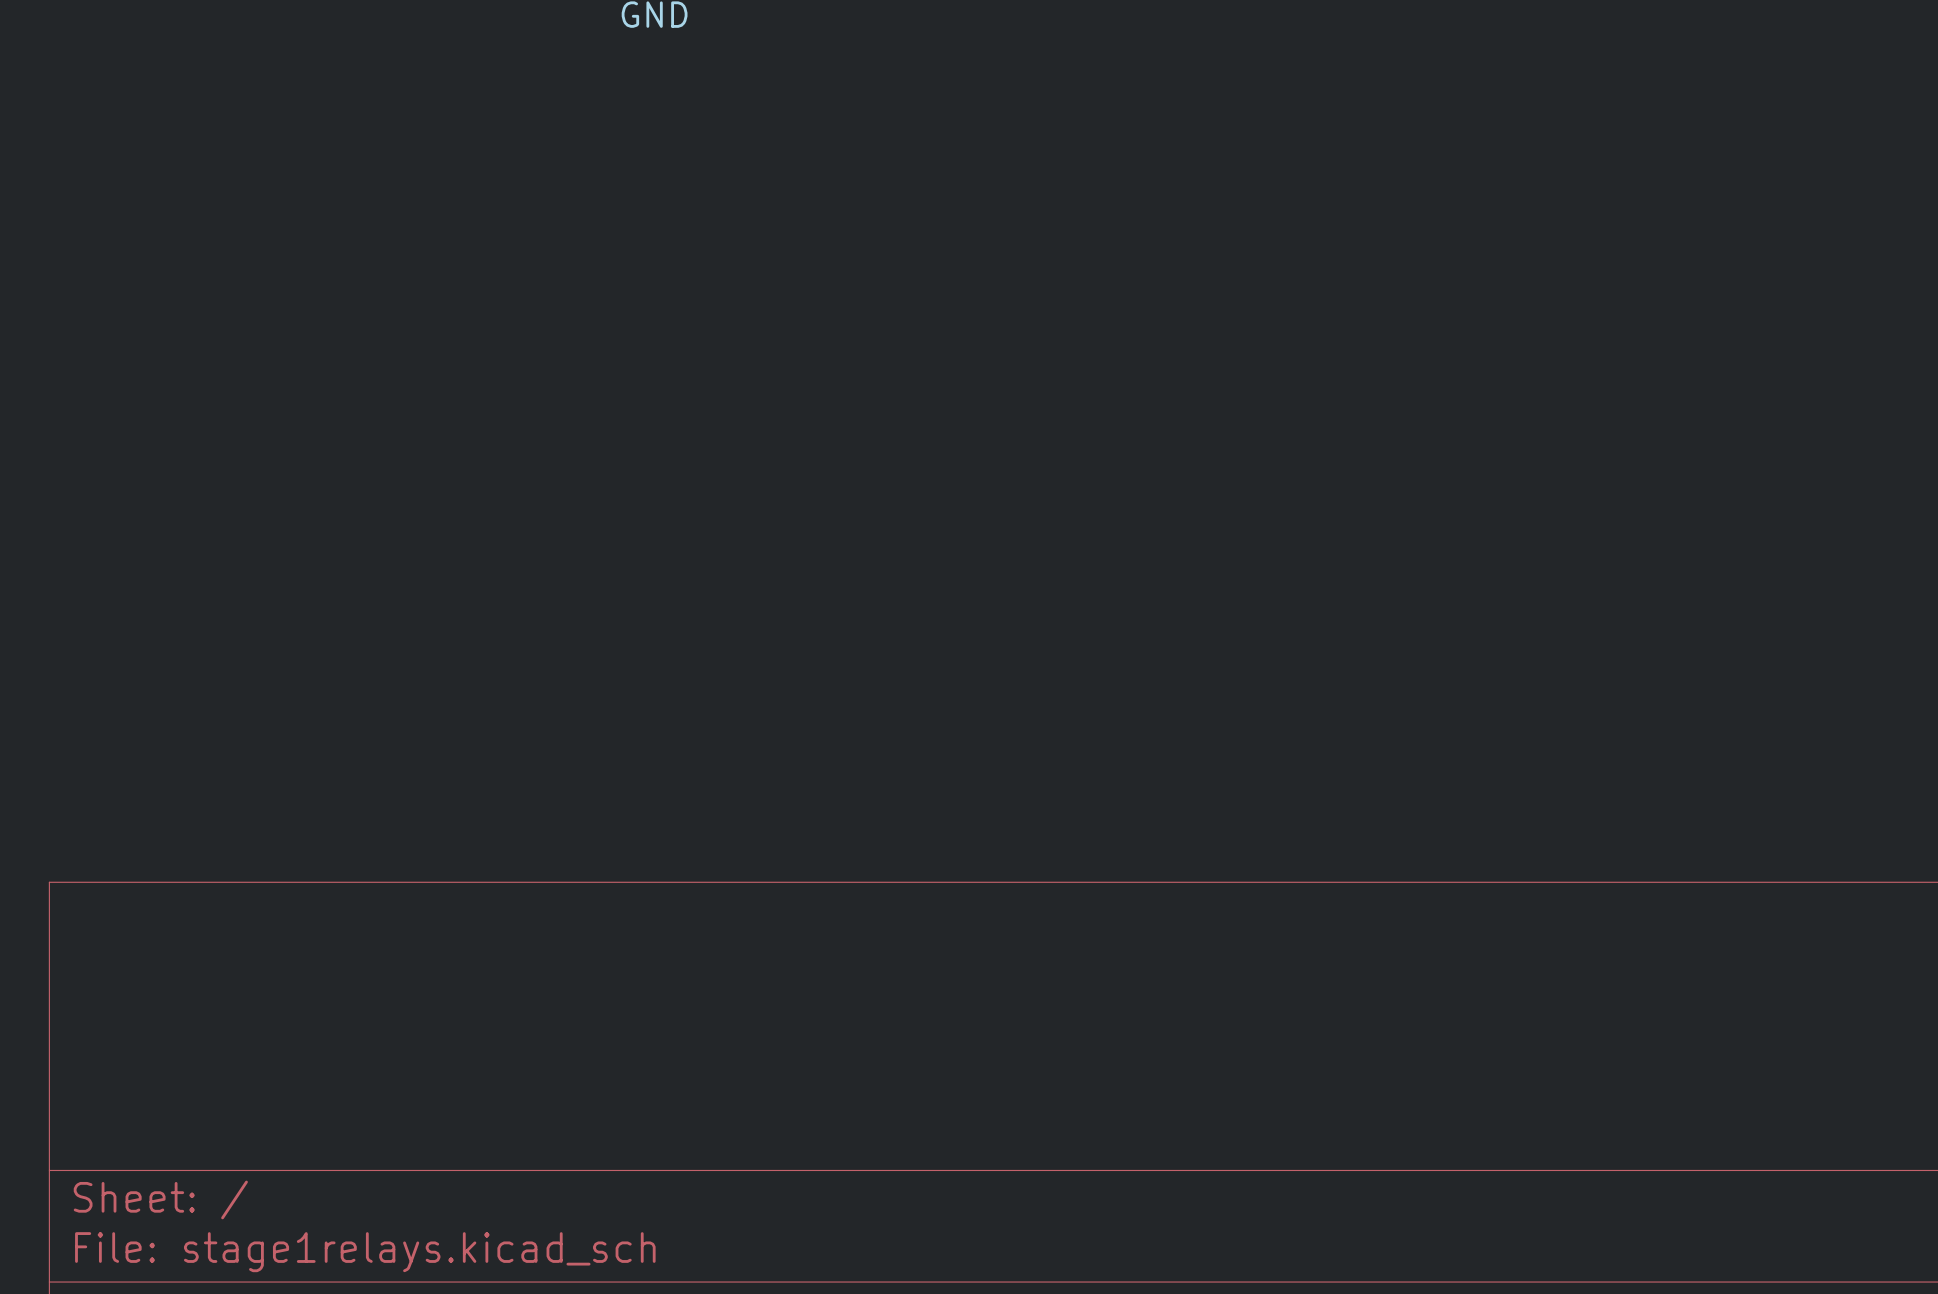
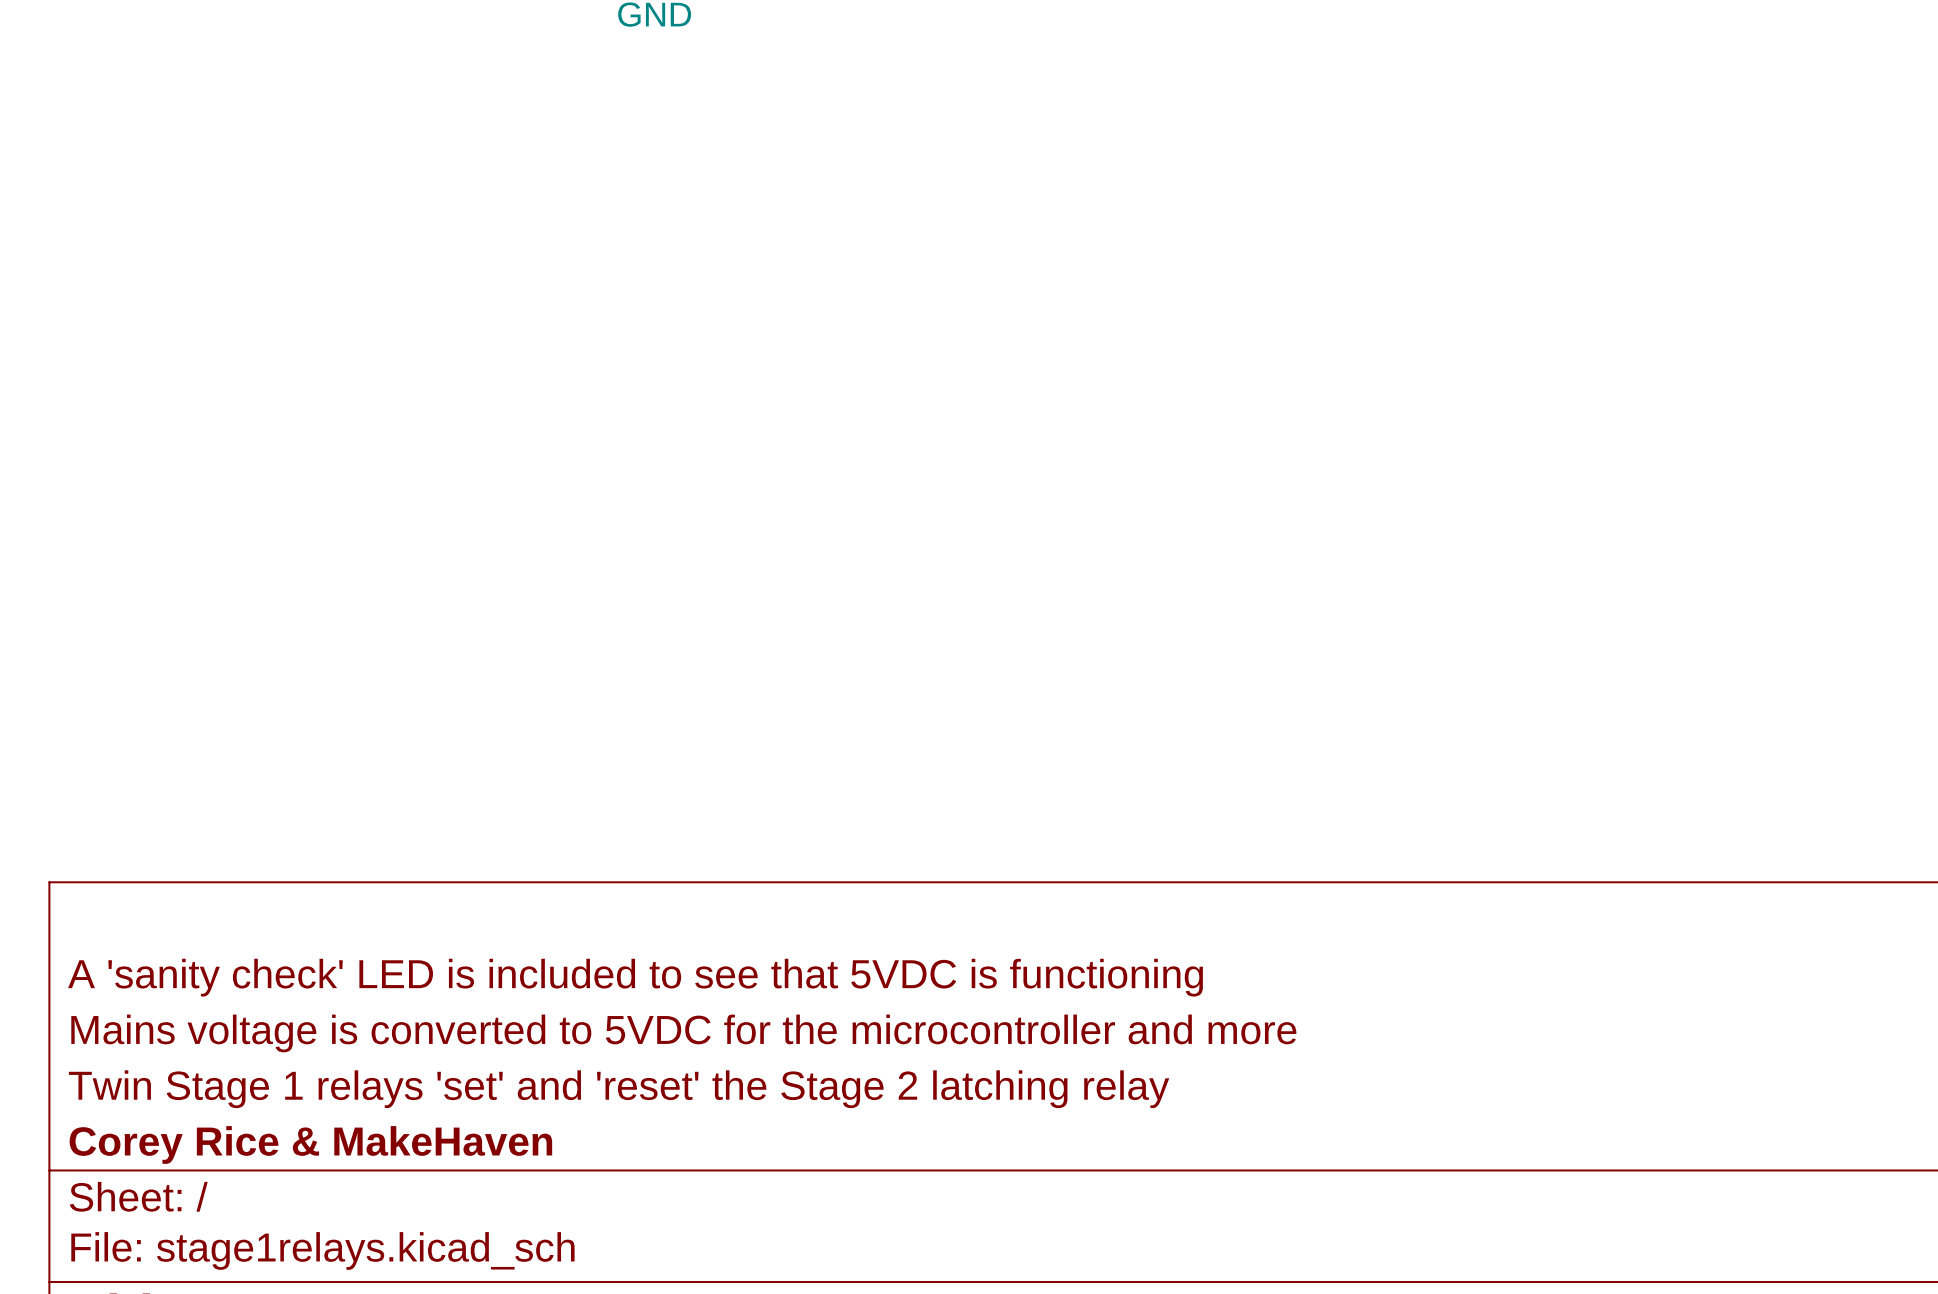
title block: none -> A 'sanity check' LED is included to see that 5VDC is functioning (635, 977)
title block: none -> Mains voltage is converted to 5VDC for the microcontroller and more (683, 1033)
title block: none -> Twin Stage 1 relays 'set' and 'reset' the Stage 2 latching relay (619, 1089)
title block: none -> Corey Rice & MakeHaven (310, 1145)

